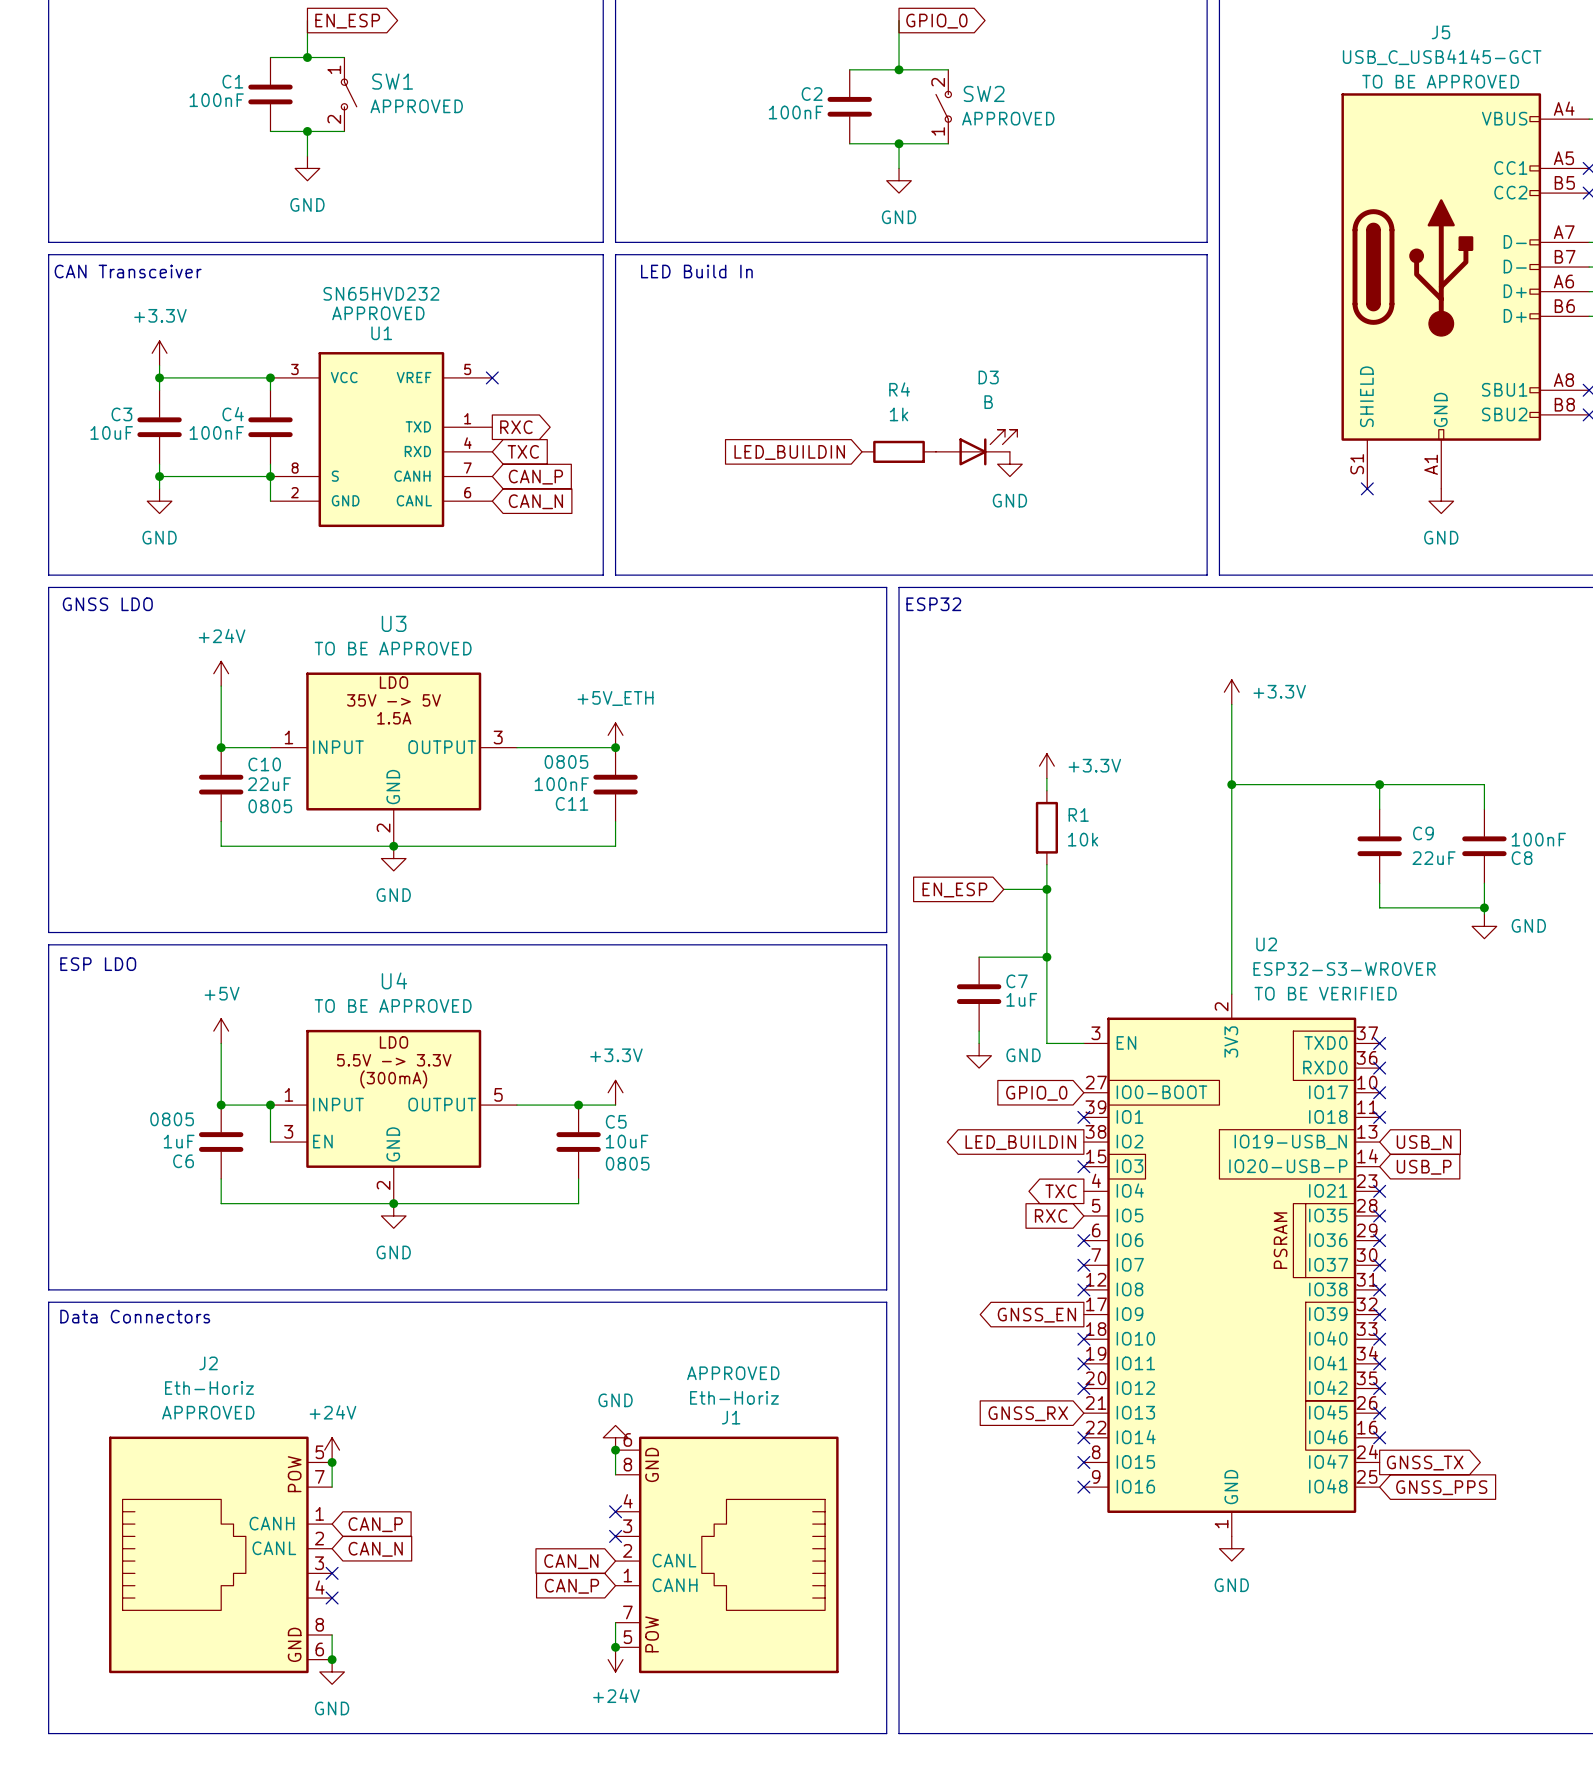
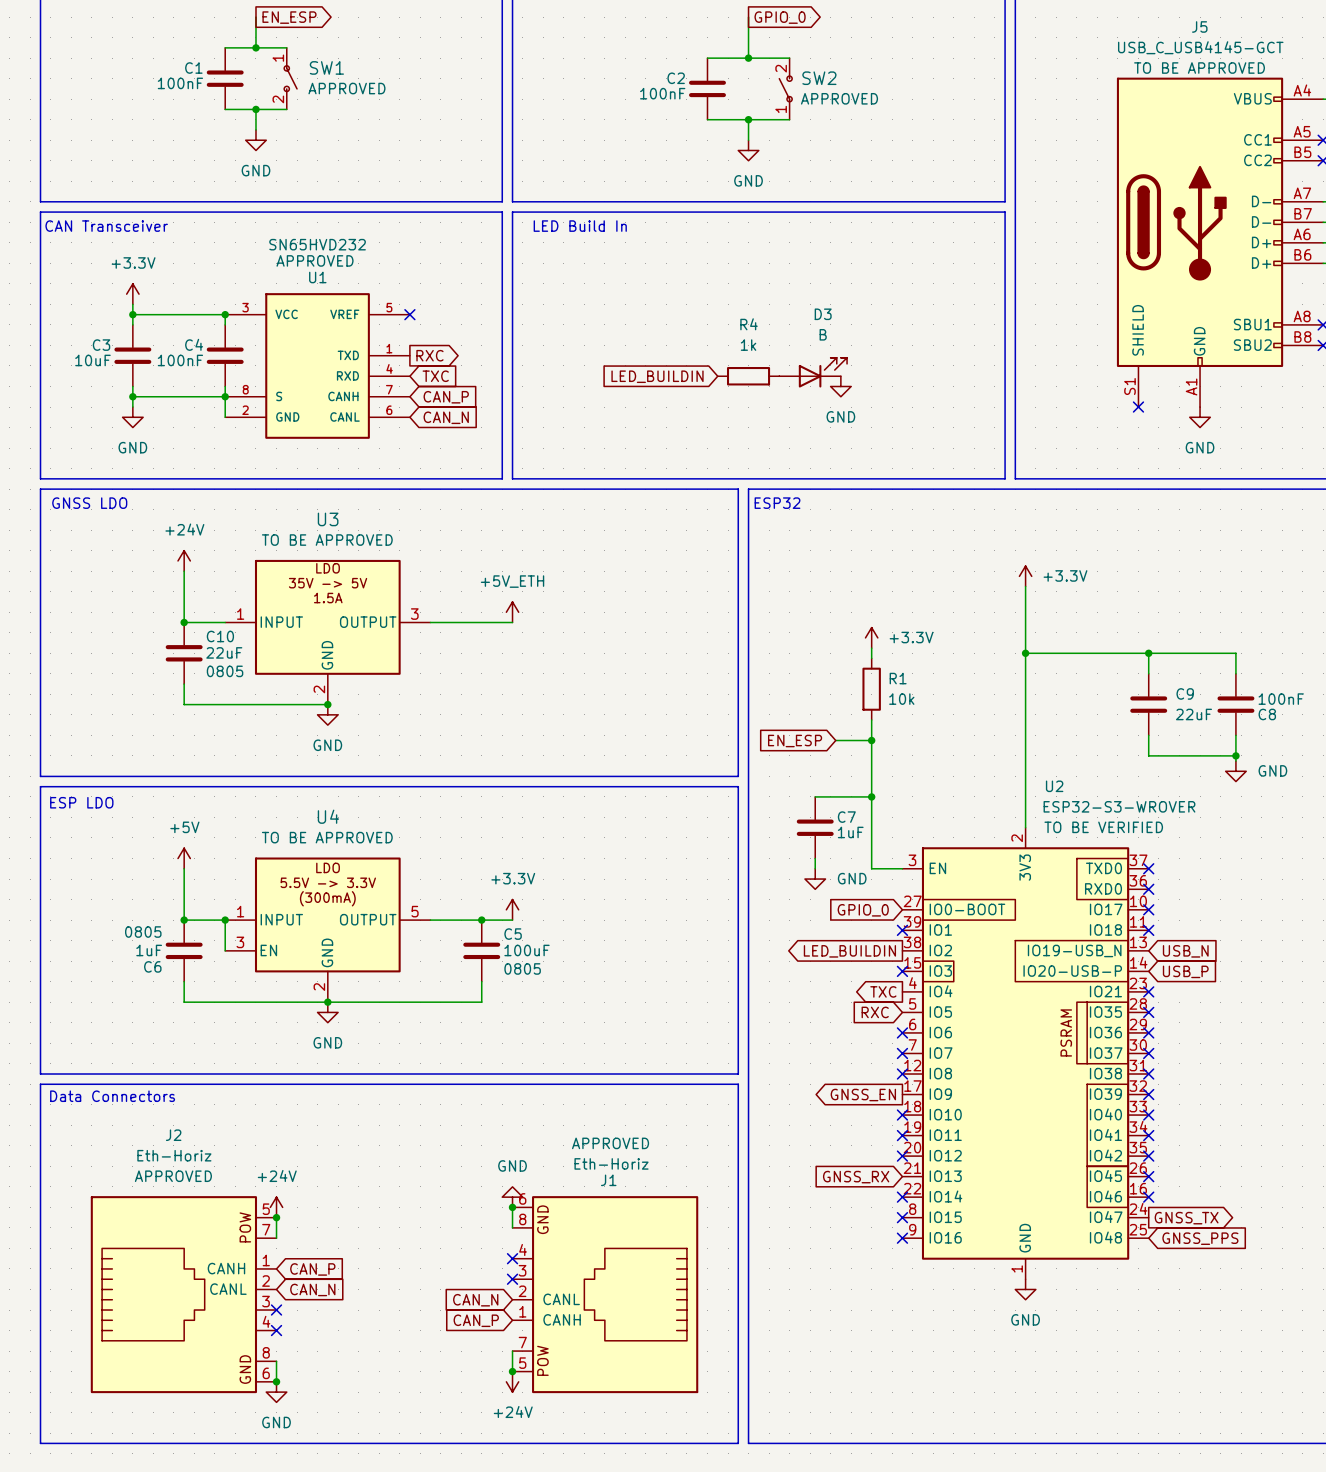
junction: (615, 747) -> none
C11: 100nF (615, 784) -> none
wire: (615, 821) (615, 846) (393, 846) -> none
C5 value: 10uF (627, 1141) -> 100uF (527, 950)

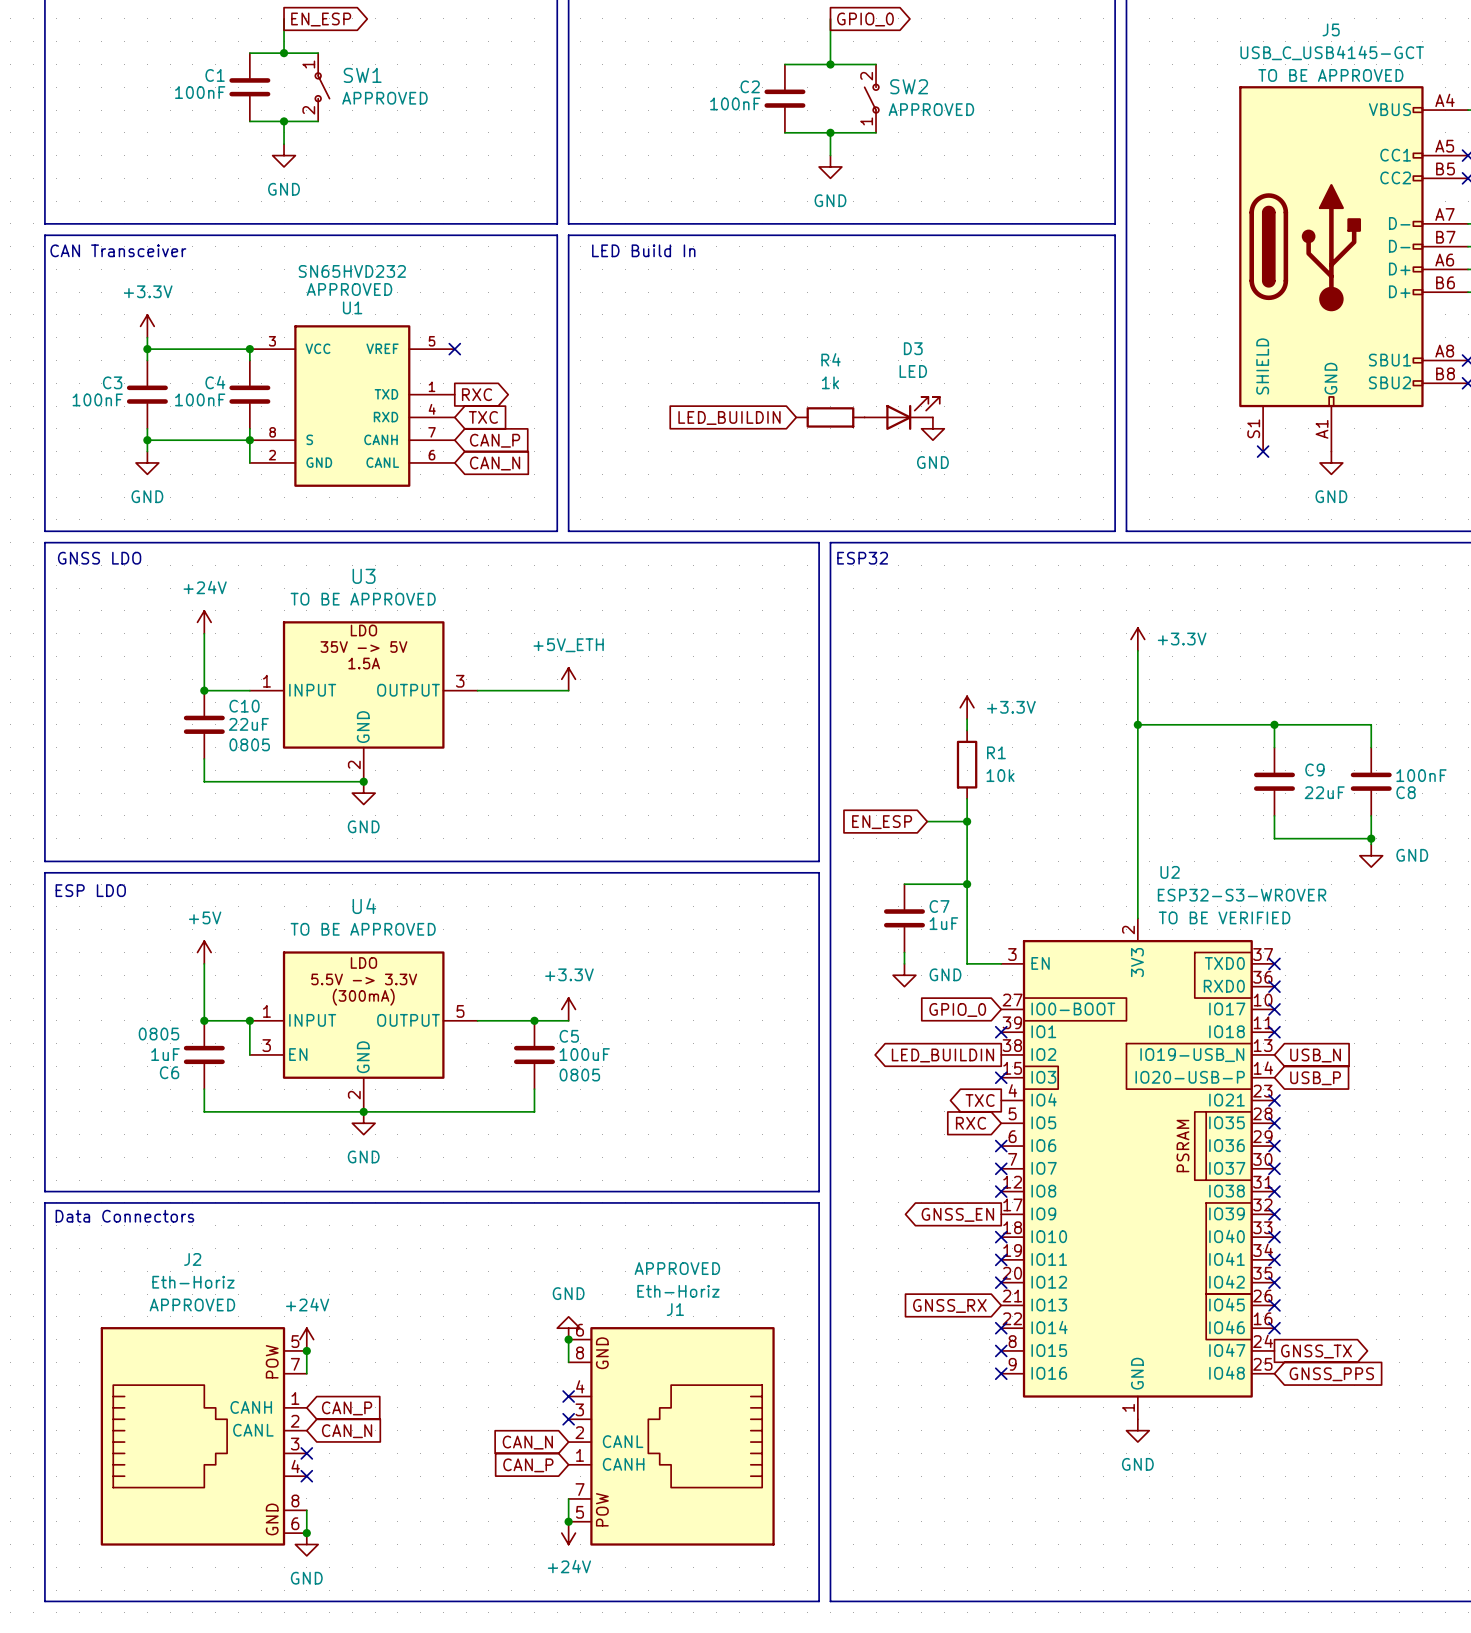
D3 value: B (823, 334) -> LED (913, 371)
C3 value: 10uF (92, 360) -> 100nF (97, 399)

